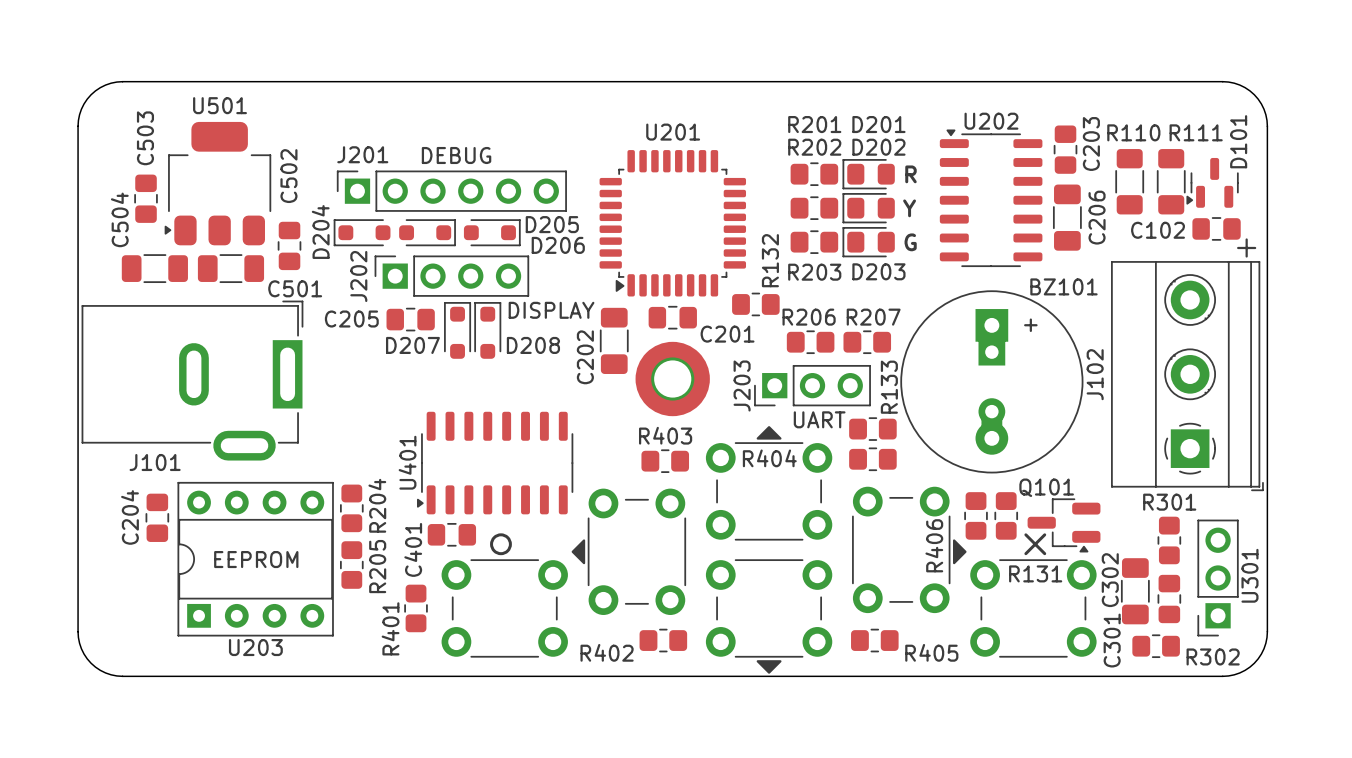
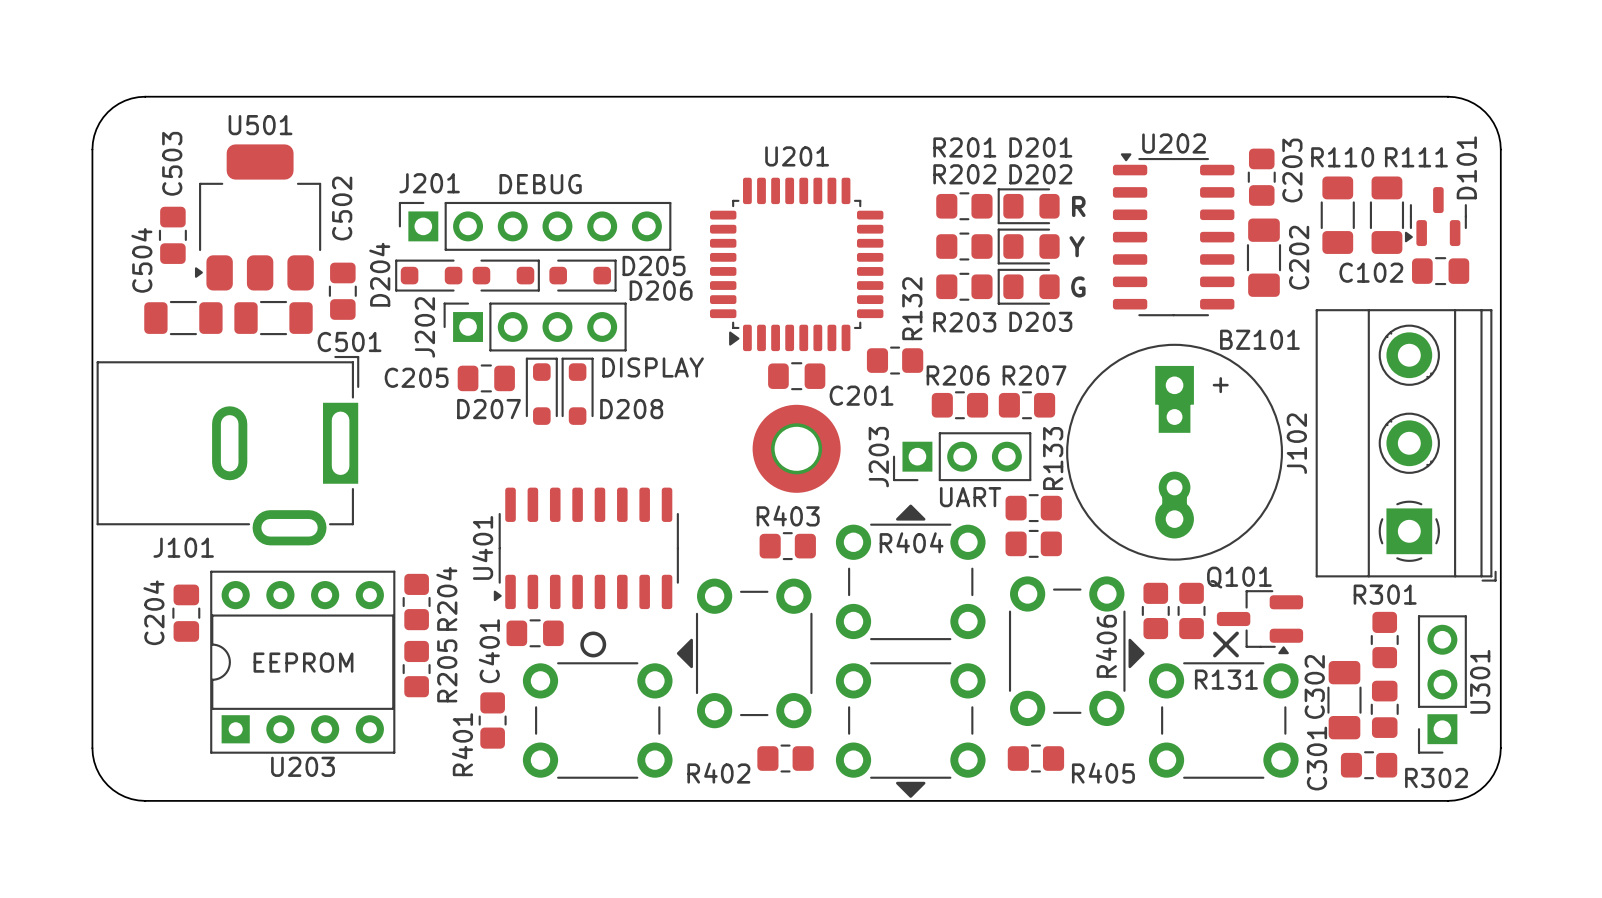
C206 name: C206 (1097, 217) -> C202 (1299, 257)
text: + (1246, 247) -> none
C202: (614, 340) -> none

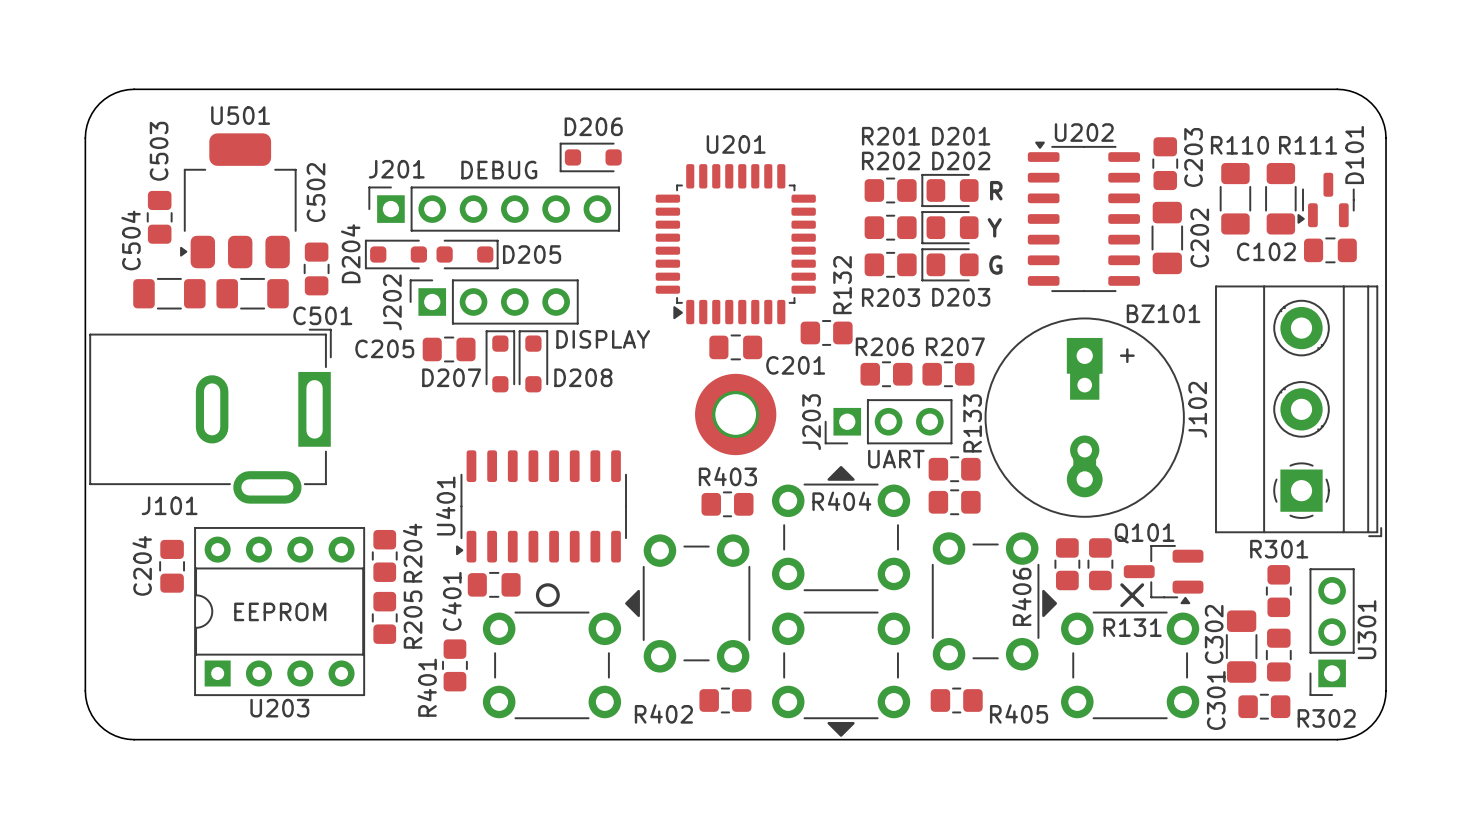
D205 name position: D205 (654, 265) -> D205 (532, 254)
D206 rotation: 0° (583, 275) -> 180° (590, 157)
D206 position: (583, 275) -> (590, 157)
D206 name position: D206 (661, 290) -> D206 (593, 126)

